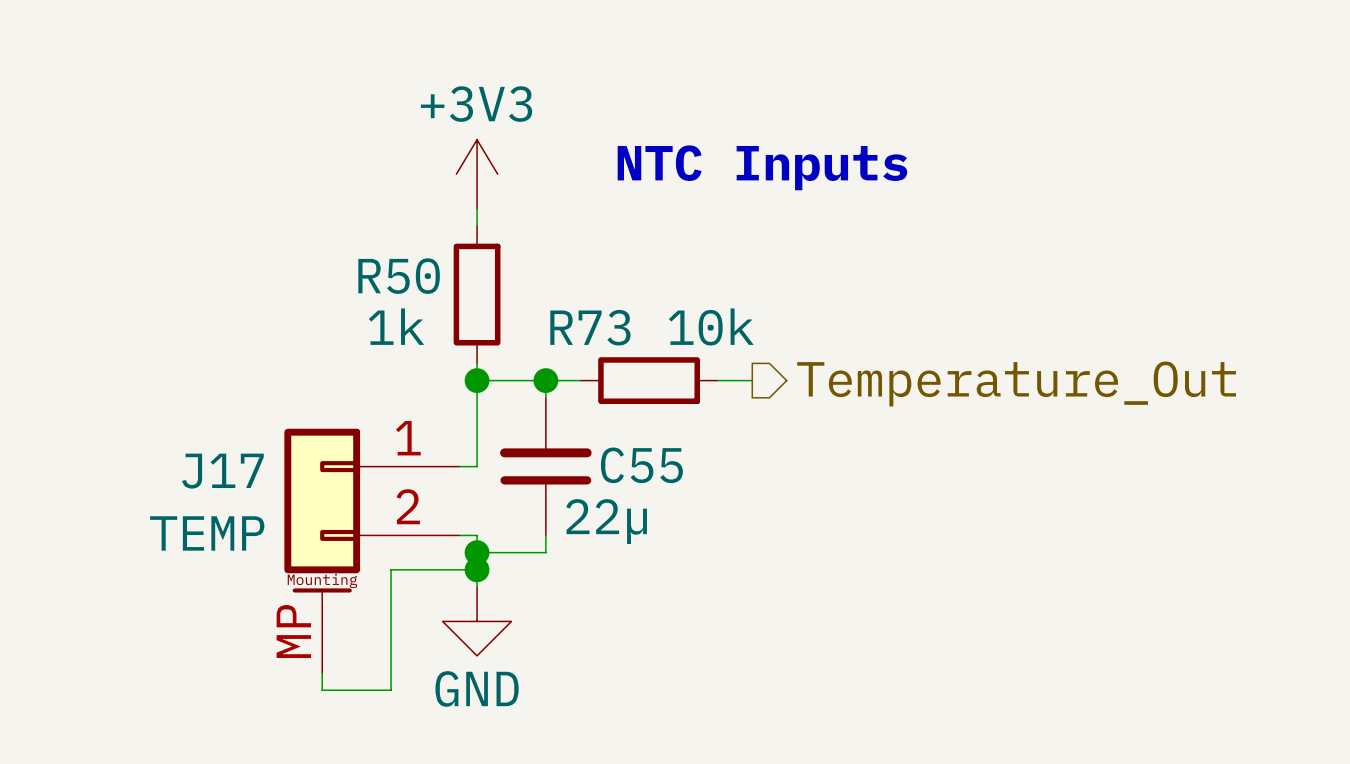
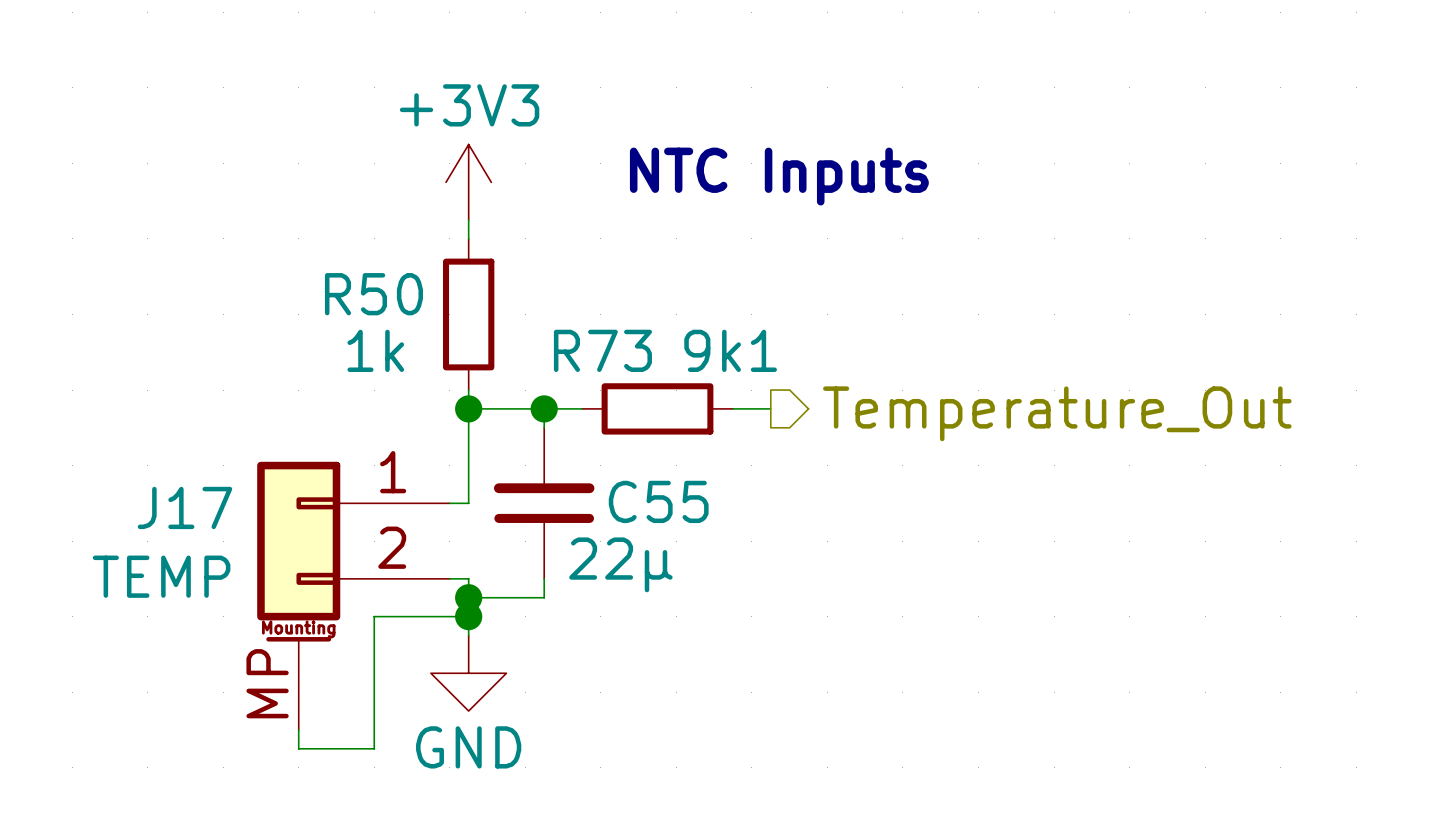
R73 value: 10k (711, 326) -> 9k1 (730, 350)

